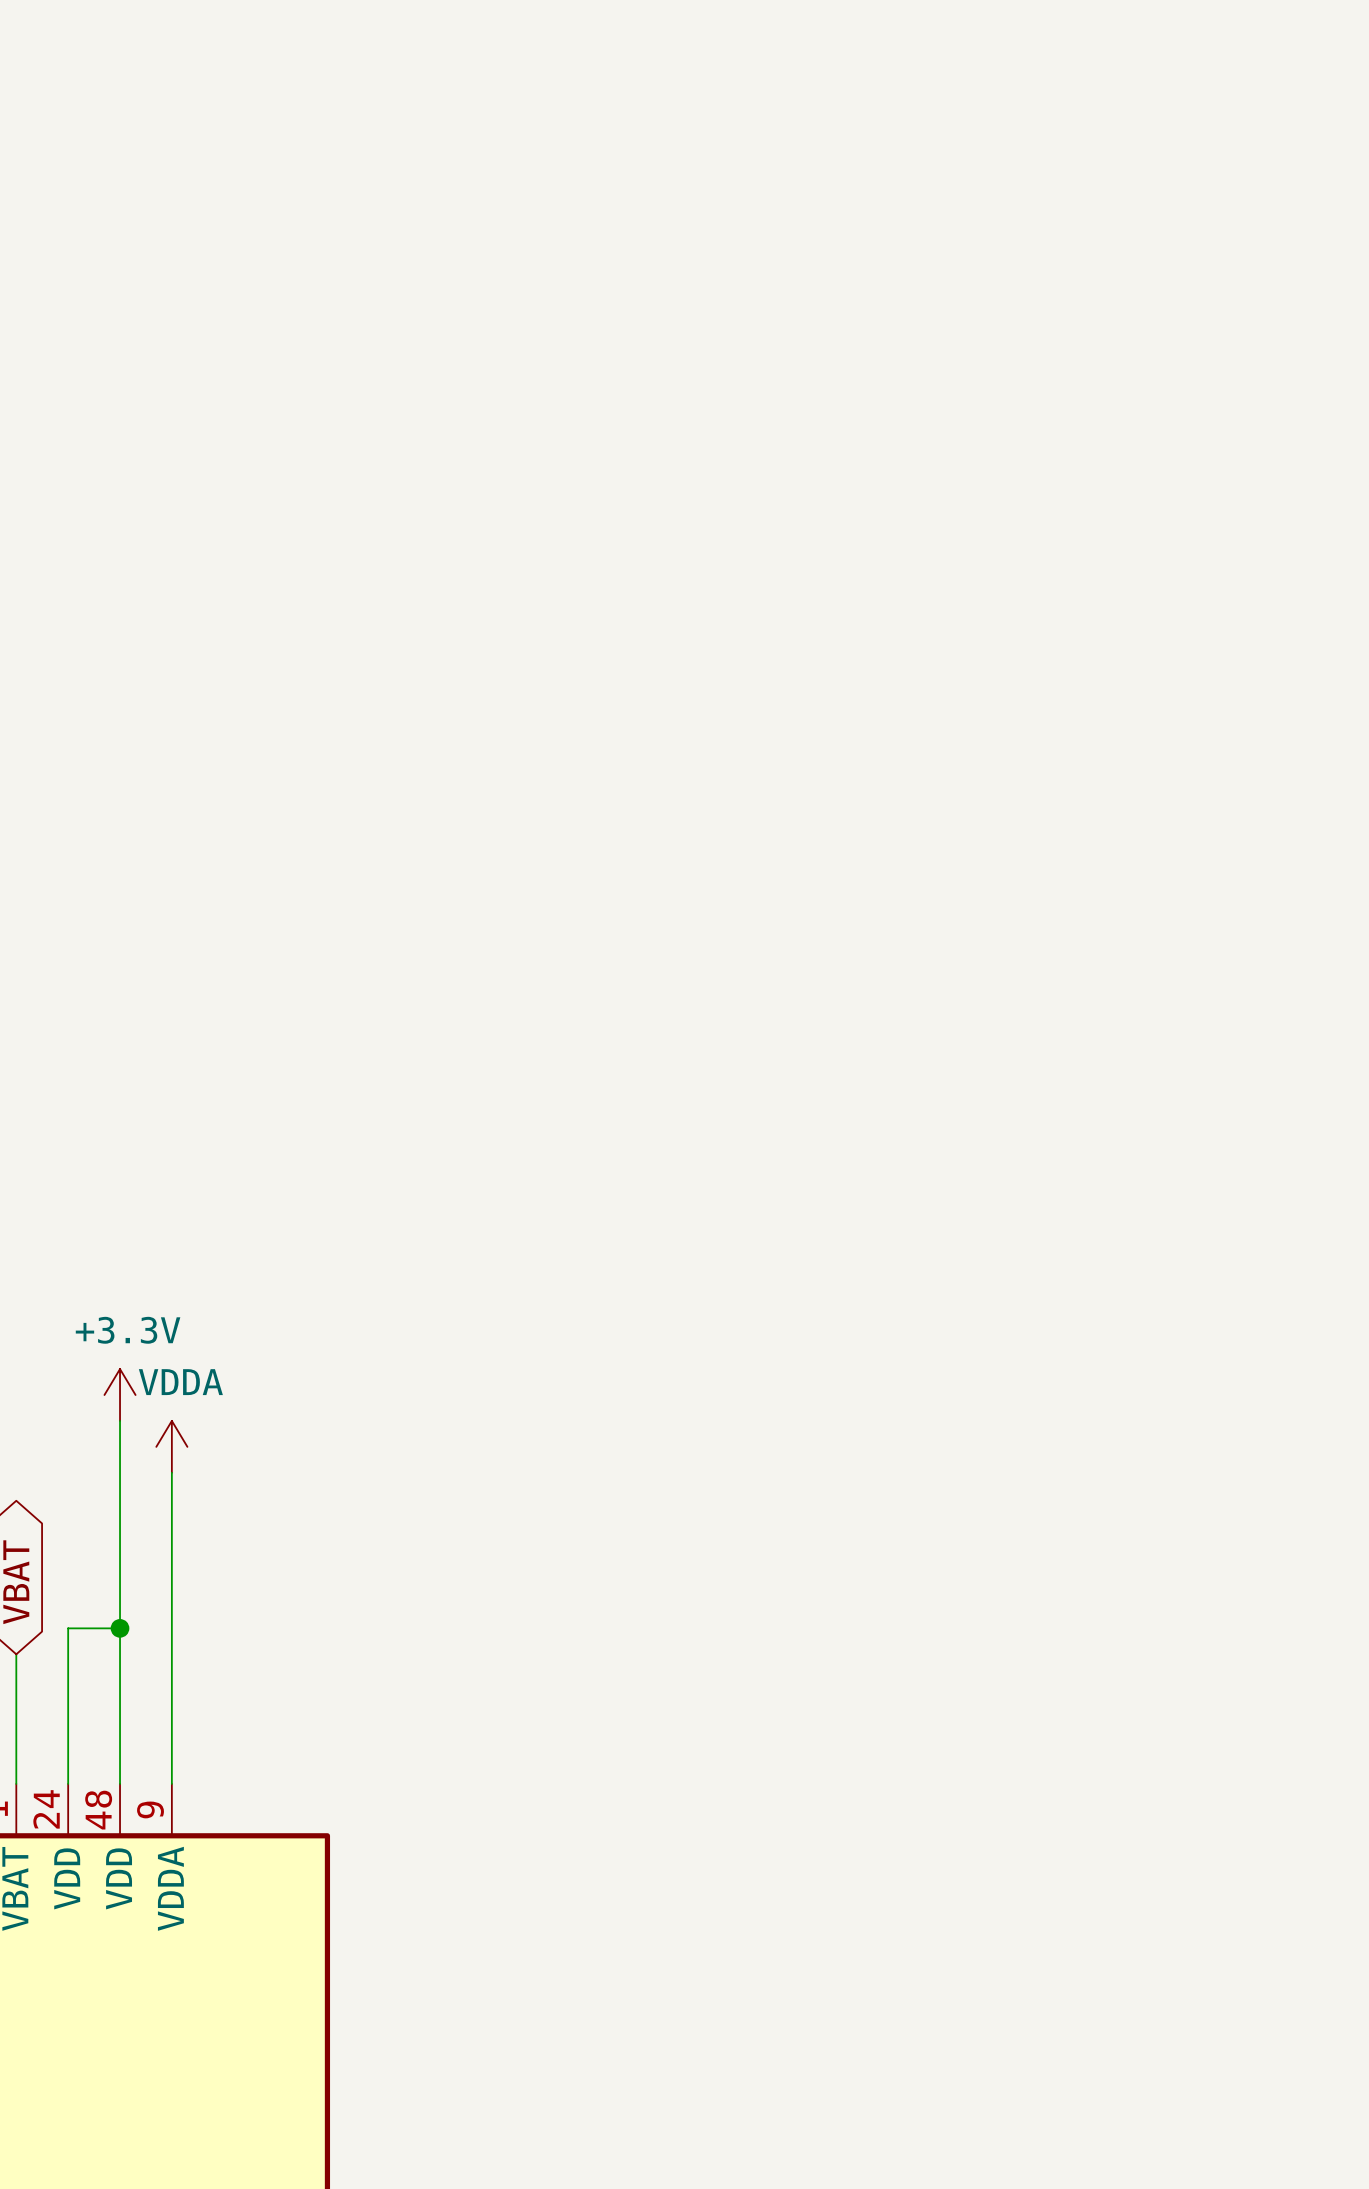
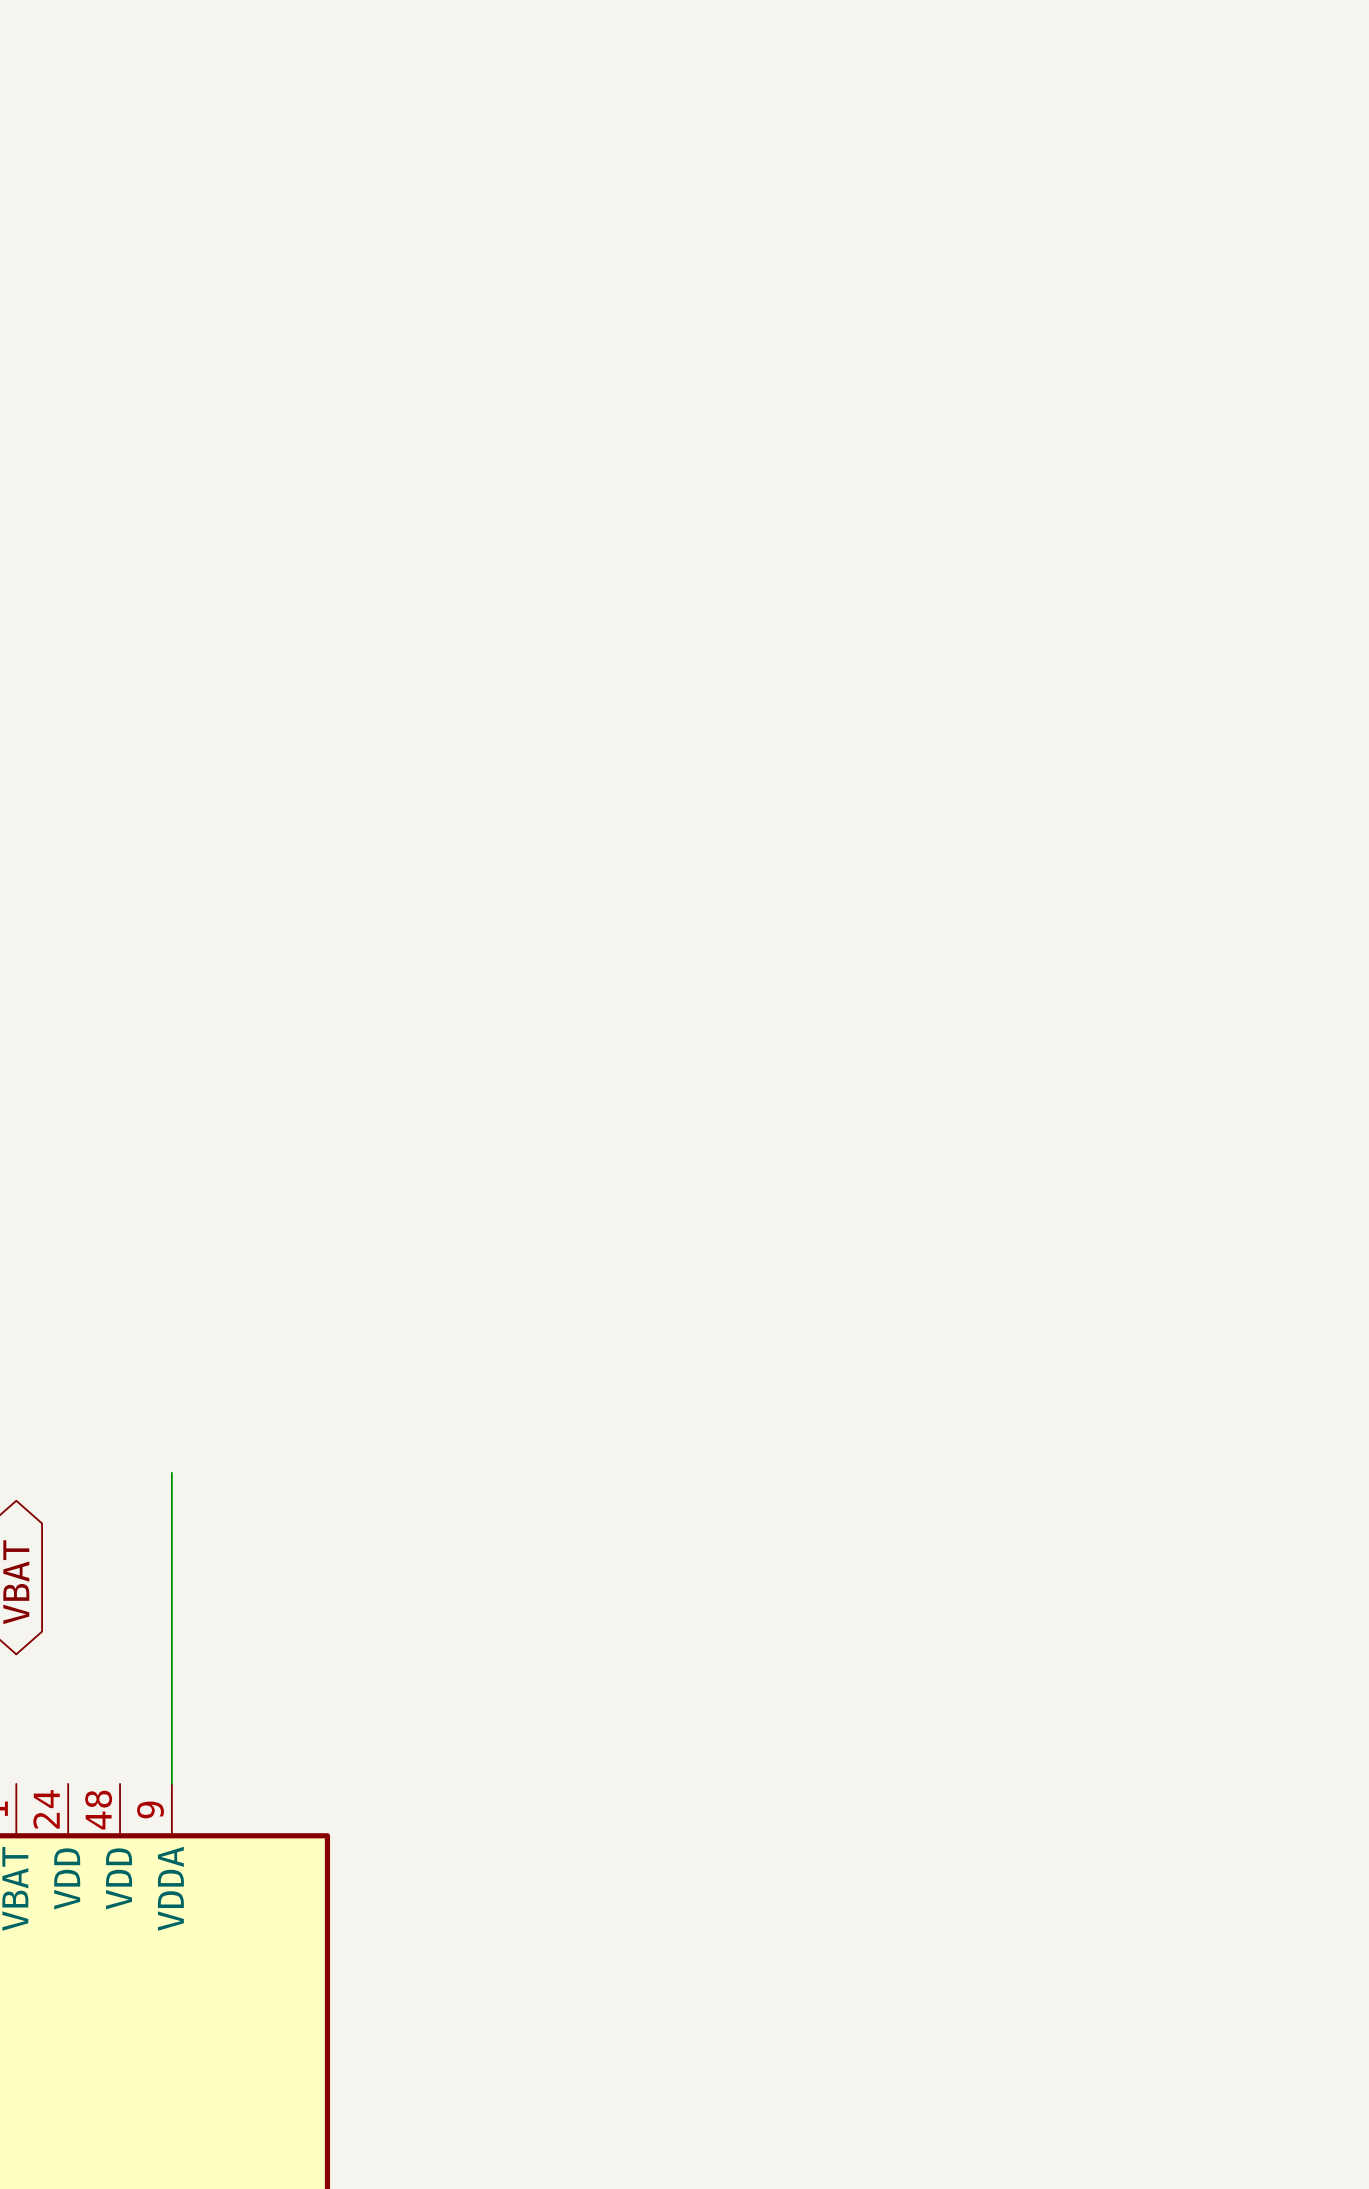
power symbol: +3.3V (120, 1395) -> none
wire: (120, 1420) (120, 1783) -> none
power symbol: VDDA (171, 1446) -> none
wire: (120, 1628) (68, 1628) (68, 1783) -> none
junction: (120, 1628) -> none
wire: (16, 1654) (16, 1783) -> none

